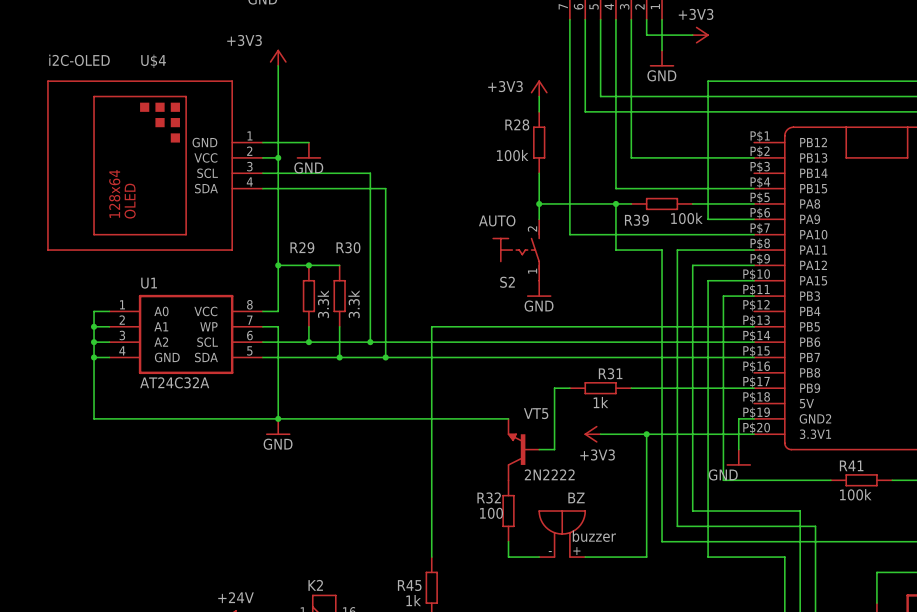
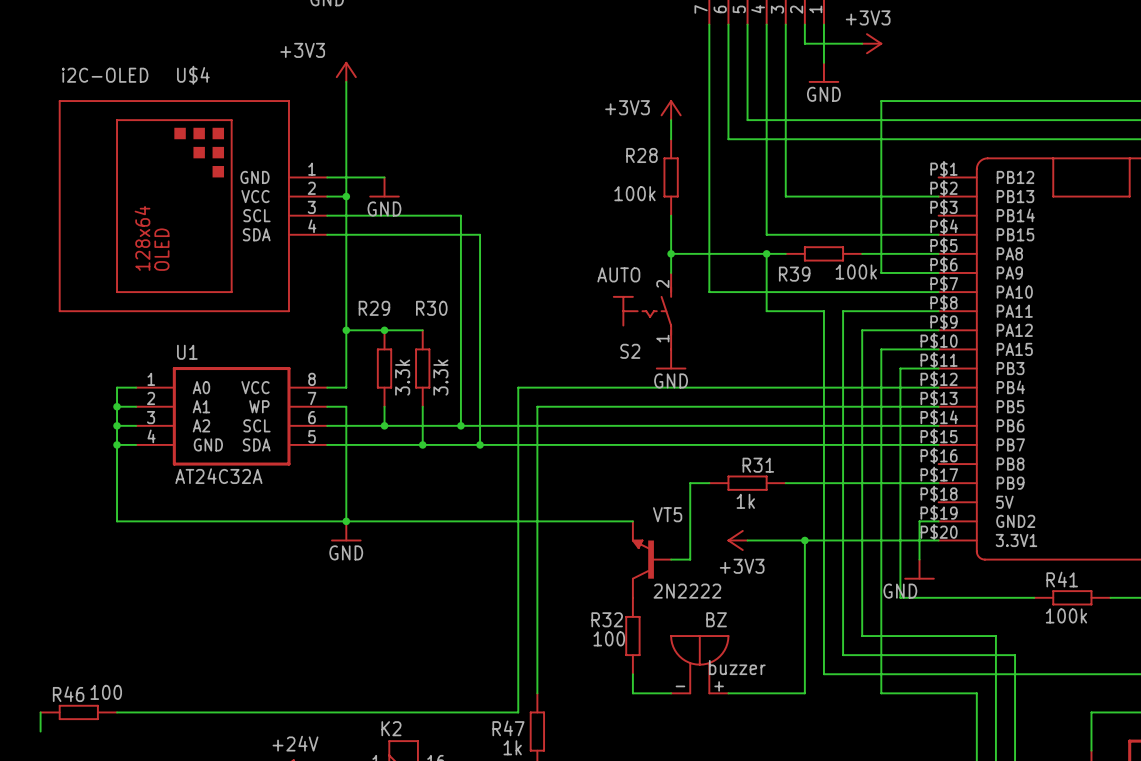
wire: none -> (938, 387) (518, 387) (518, 712) (117, 712)
wire: none -> (40, 712) (40, 731)
R46: none -> 100 (78, 712)
R45 name: R45 (409, 585) -> R47 (508, 728)

